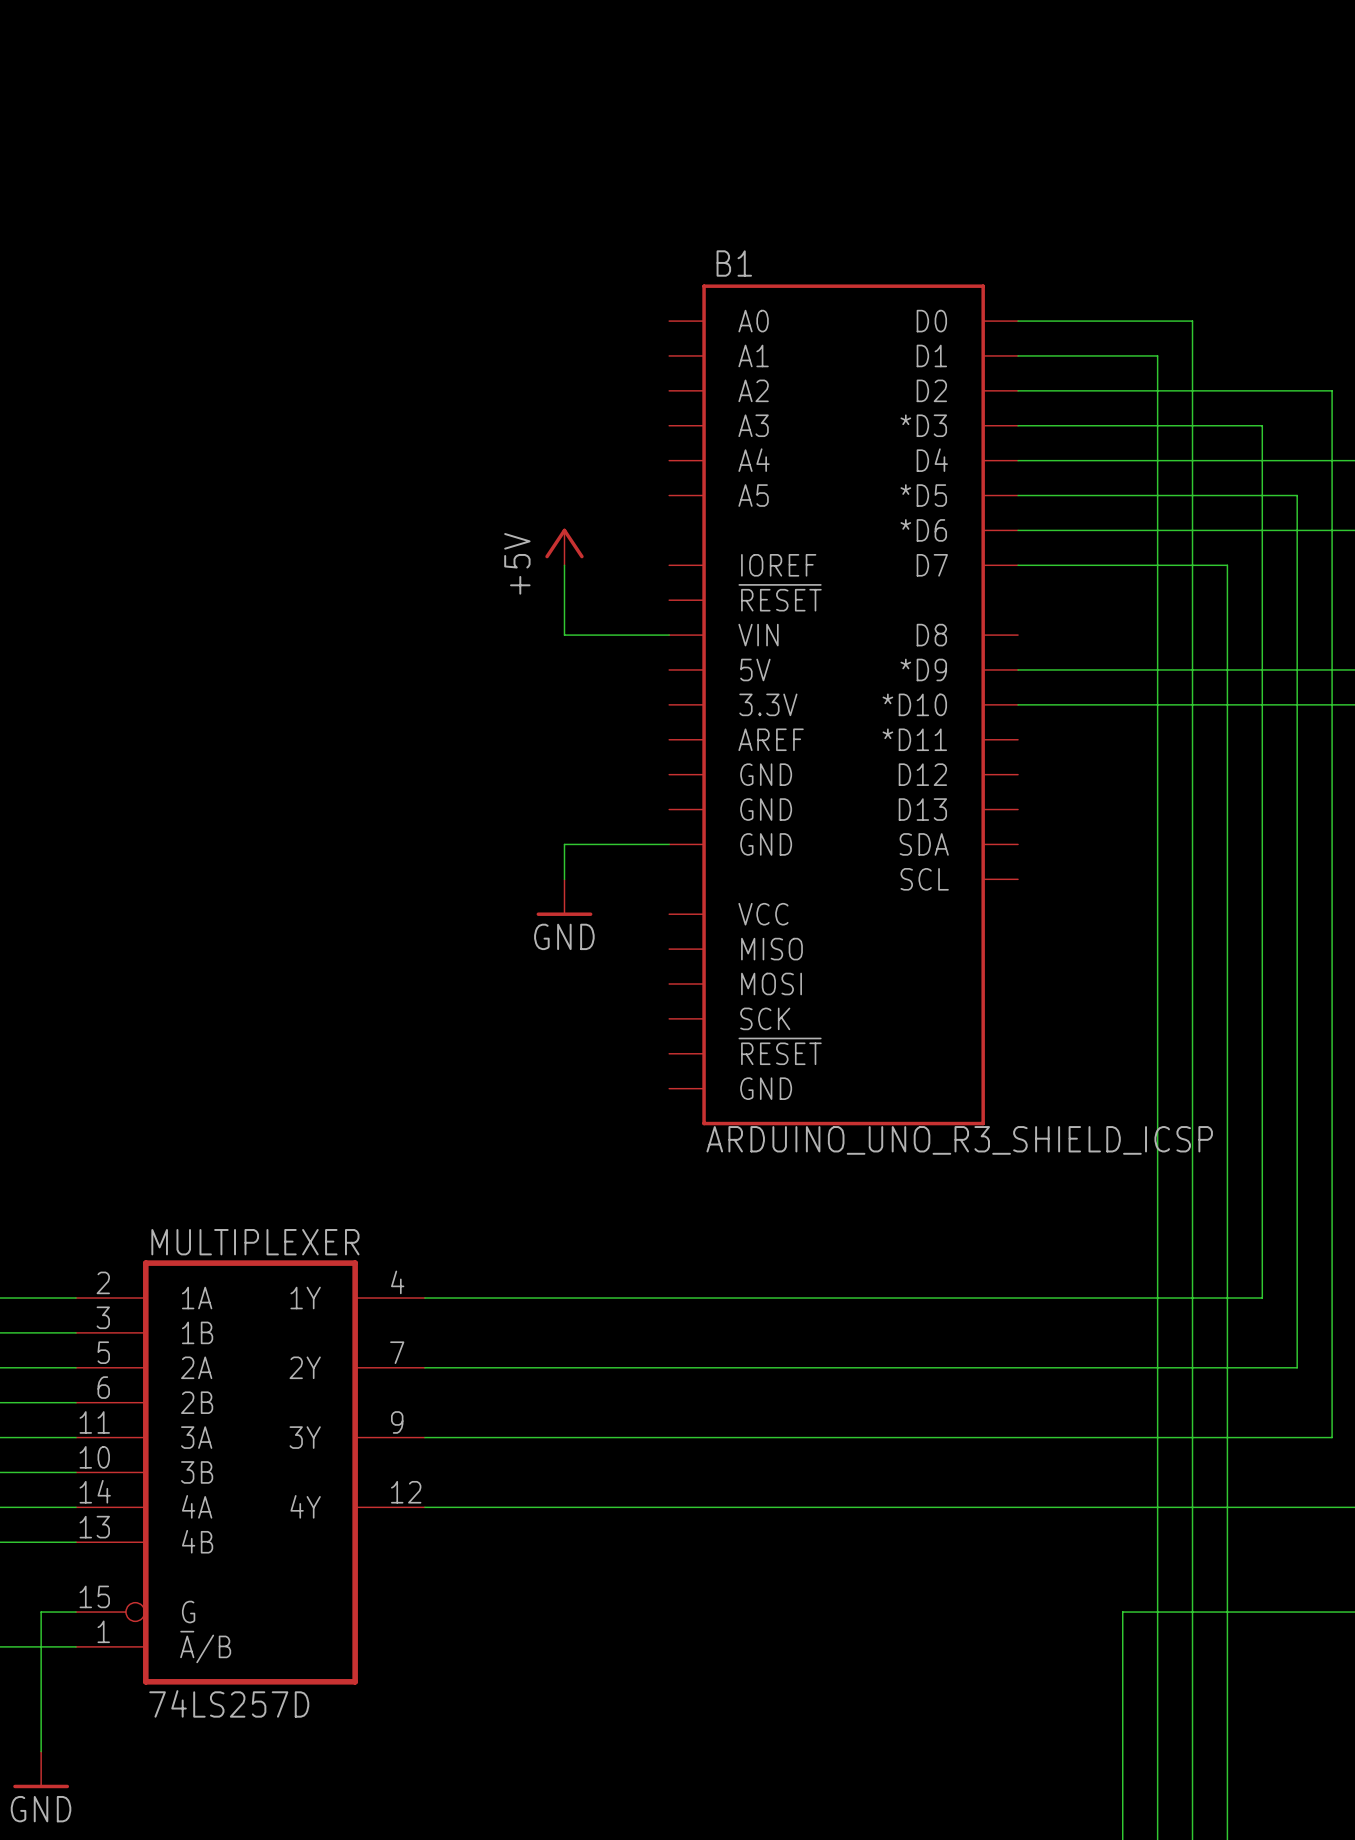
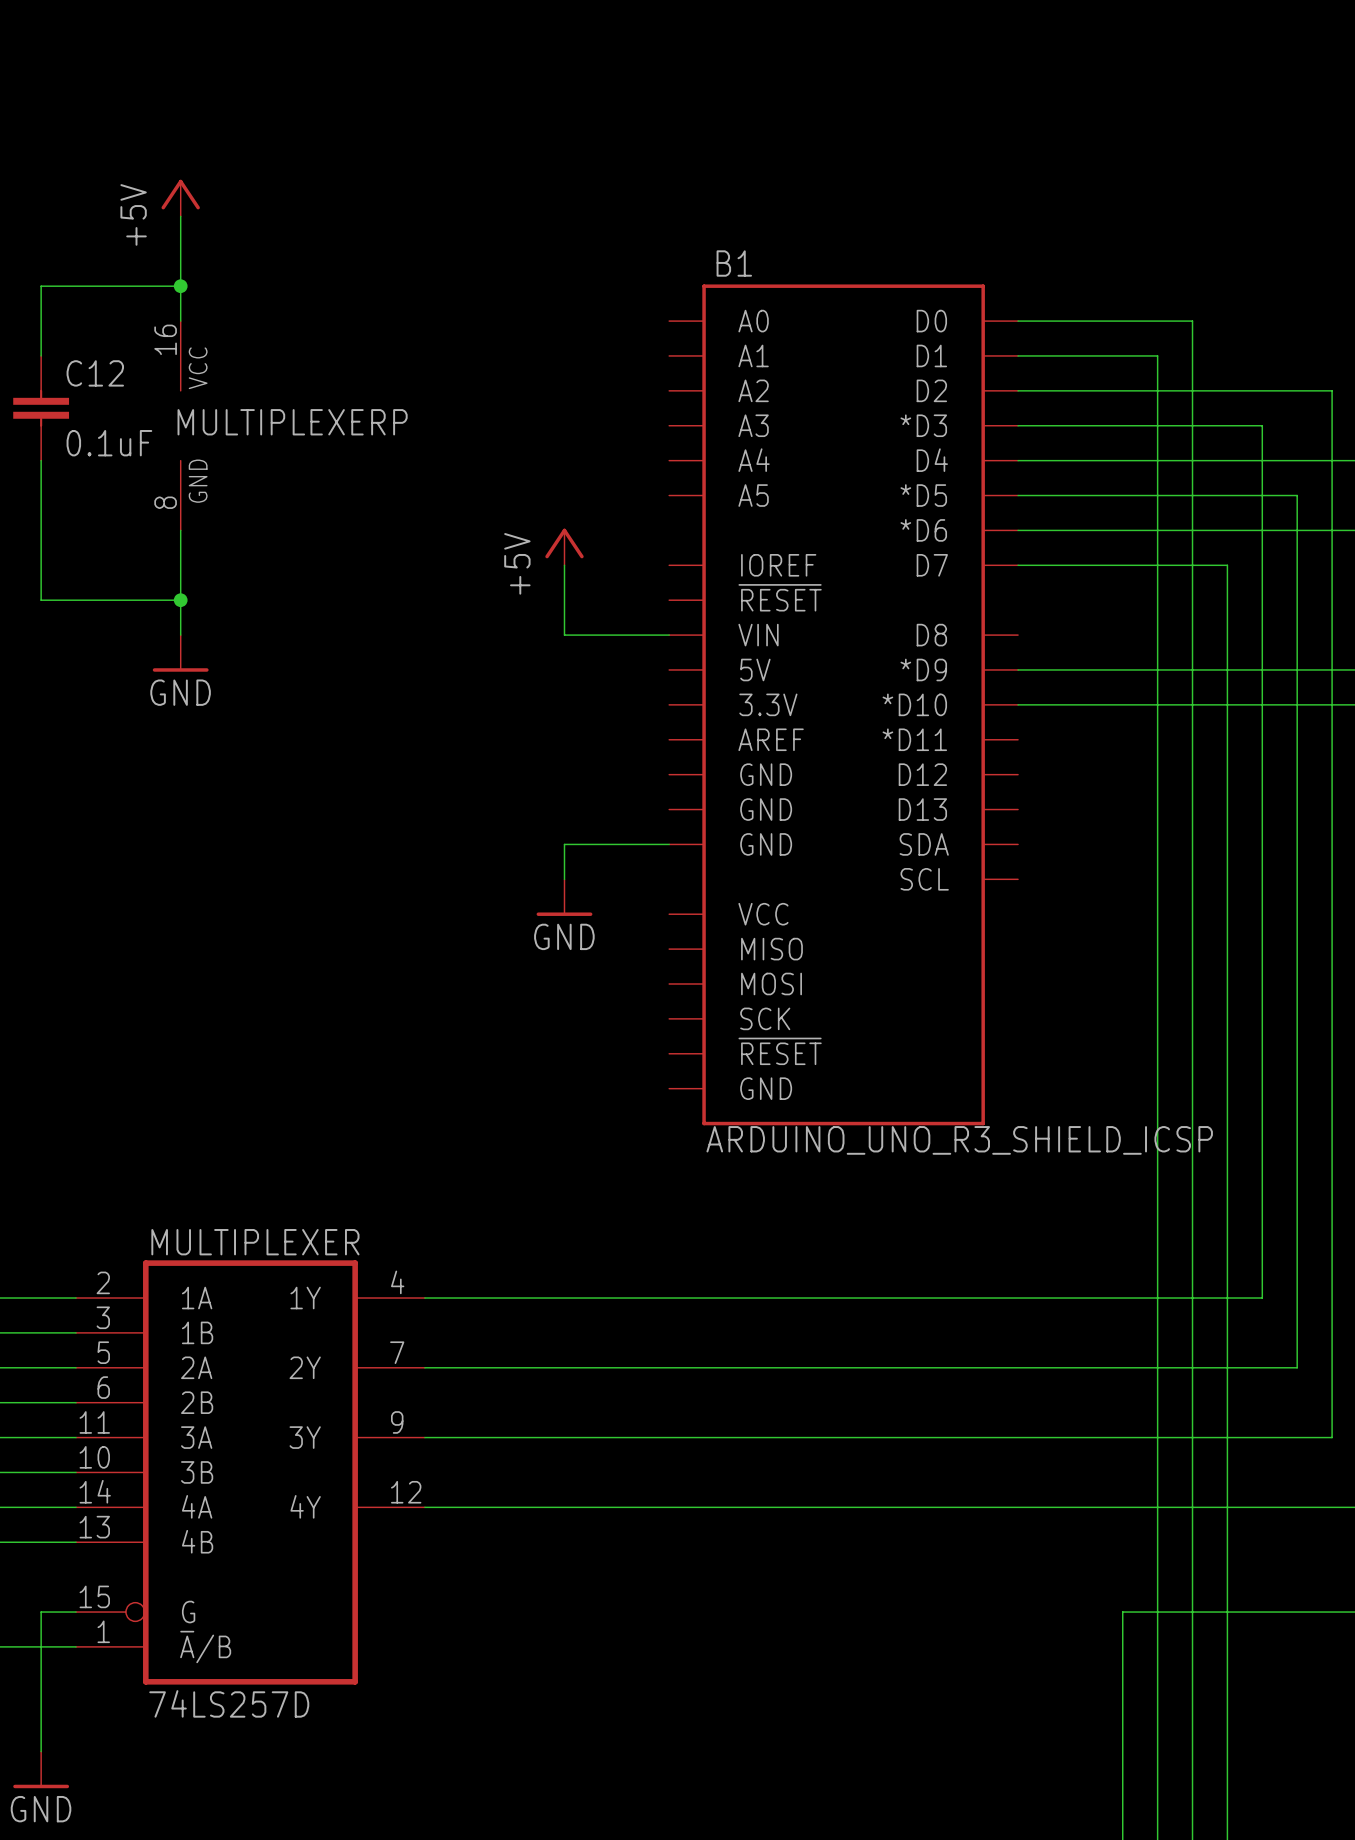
power symbol: none -> +5V (180, 198)
wire: none -> (180, 216) (180, 321)
wire: none -> (180, 286) (41, 286) (41, 355)
junction: none -> (180, 286)
C12: none -> 0.1uF (41, 408)
MULTIPLEXERP: none -> (180, 425)
wire: none -> (41, 460) (41, 600) (180, 600)
wire: none -> (180, 530) (180, 635)
junction: none -> (180, 600)
power symbol: none -> GND (180, 653)

